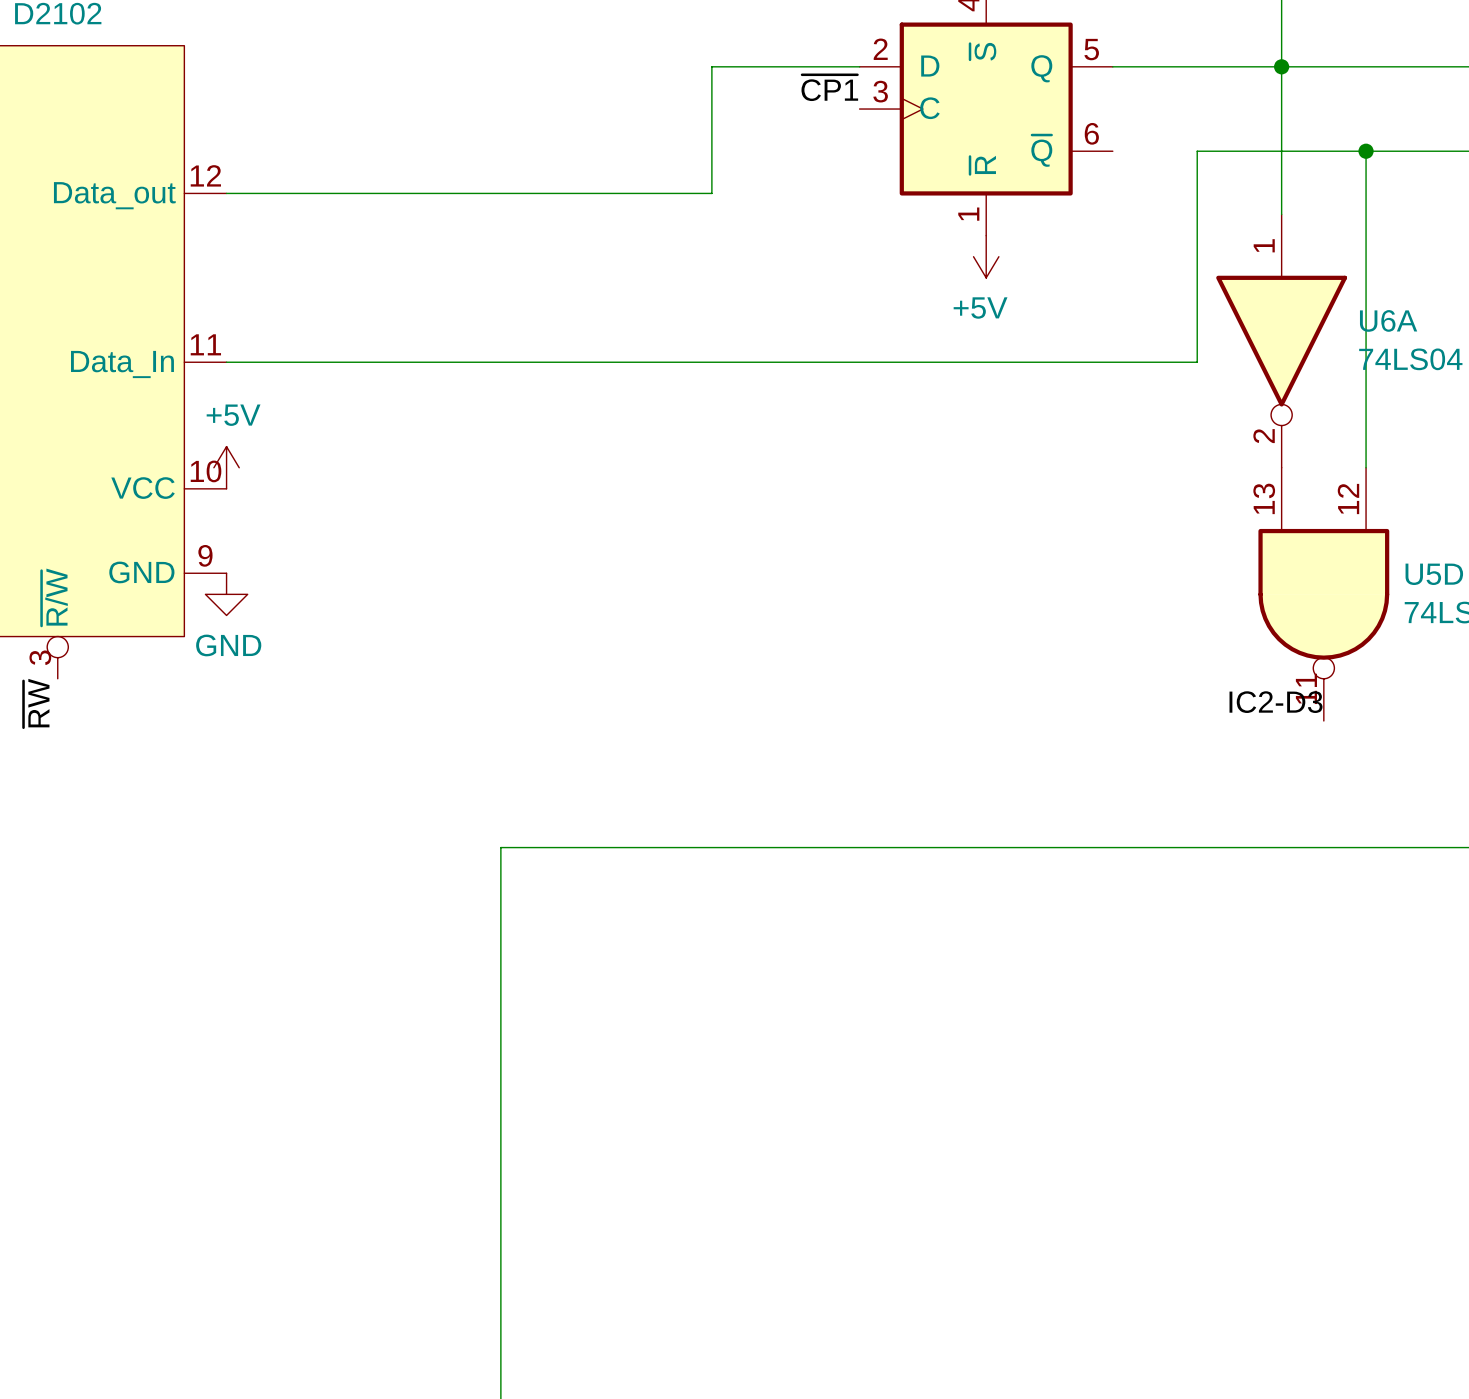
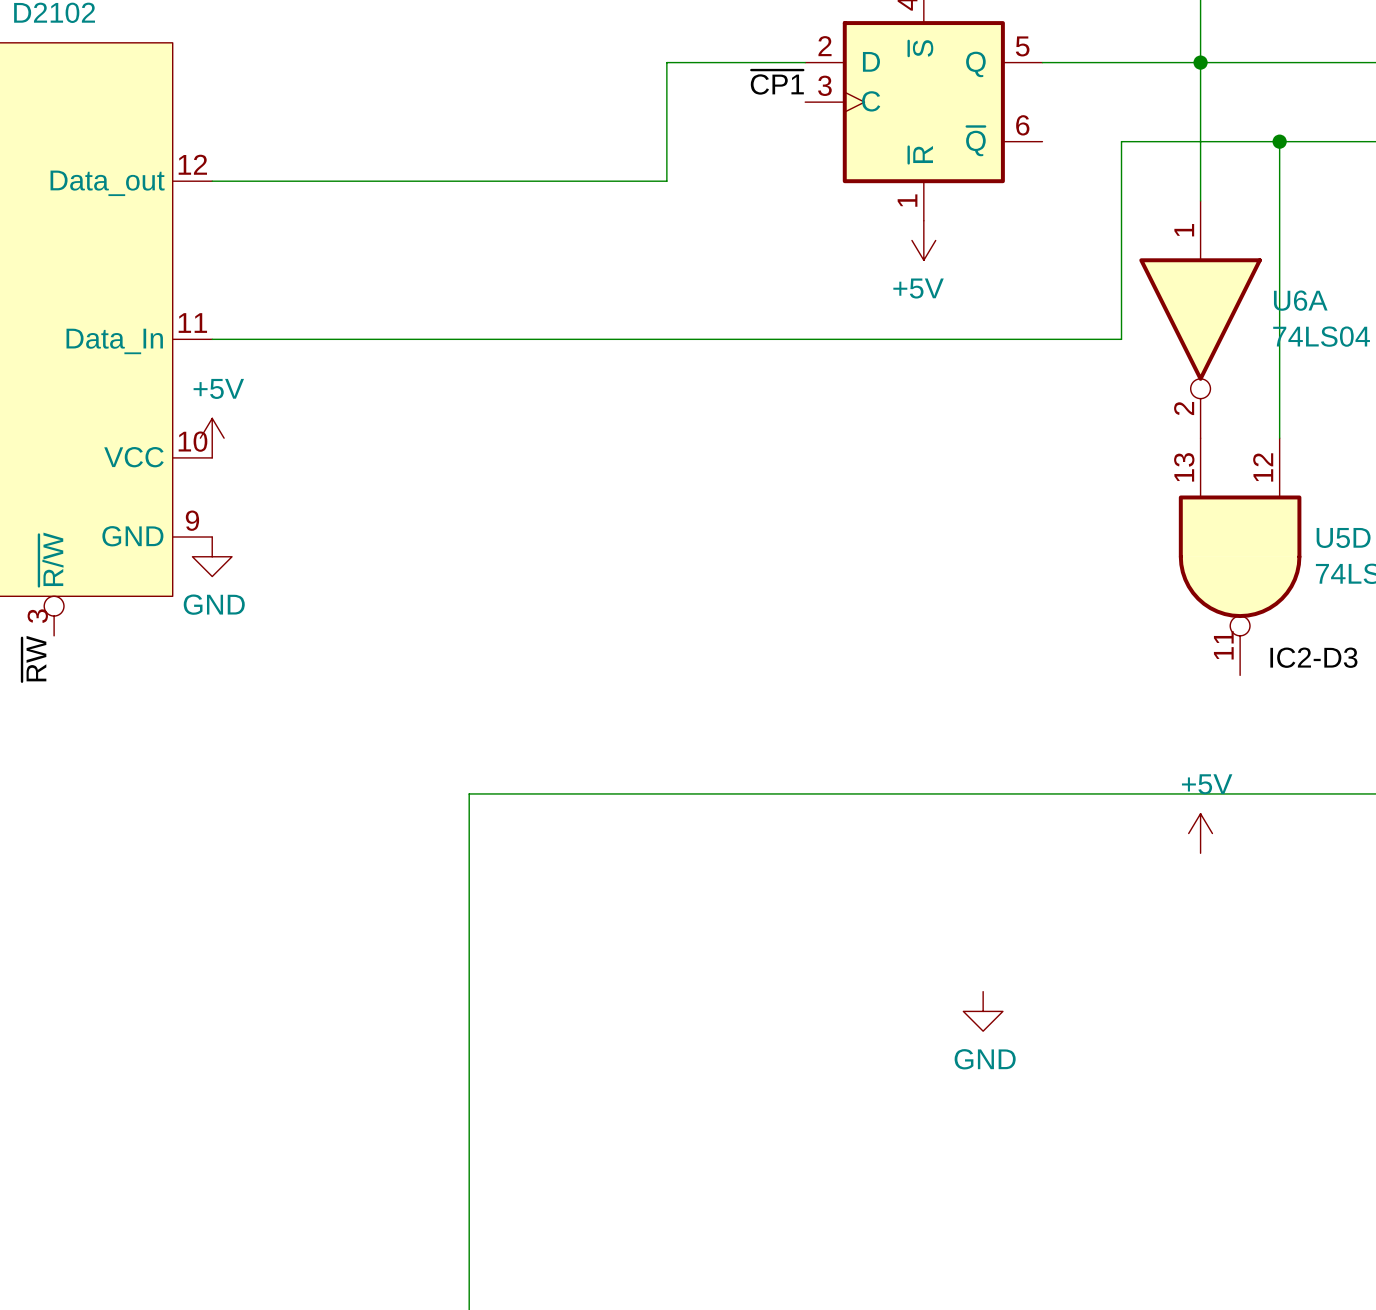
label position: IC2-D3 (1276, 702) -> IC2-D3 (1313, 657)
power symbol: none -> +5V (1200, 833)
power symbol: none -> GND (983, 1011)

